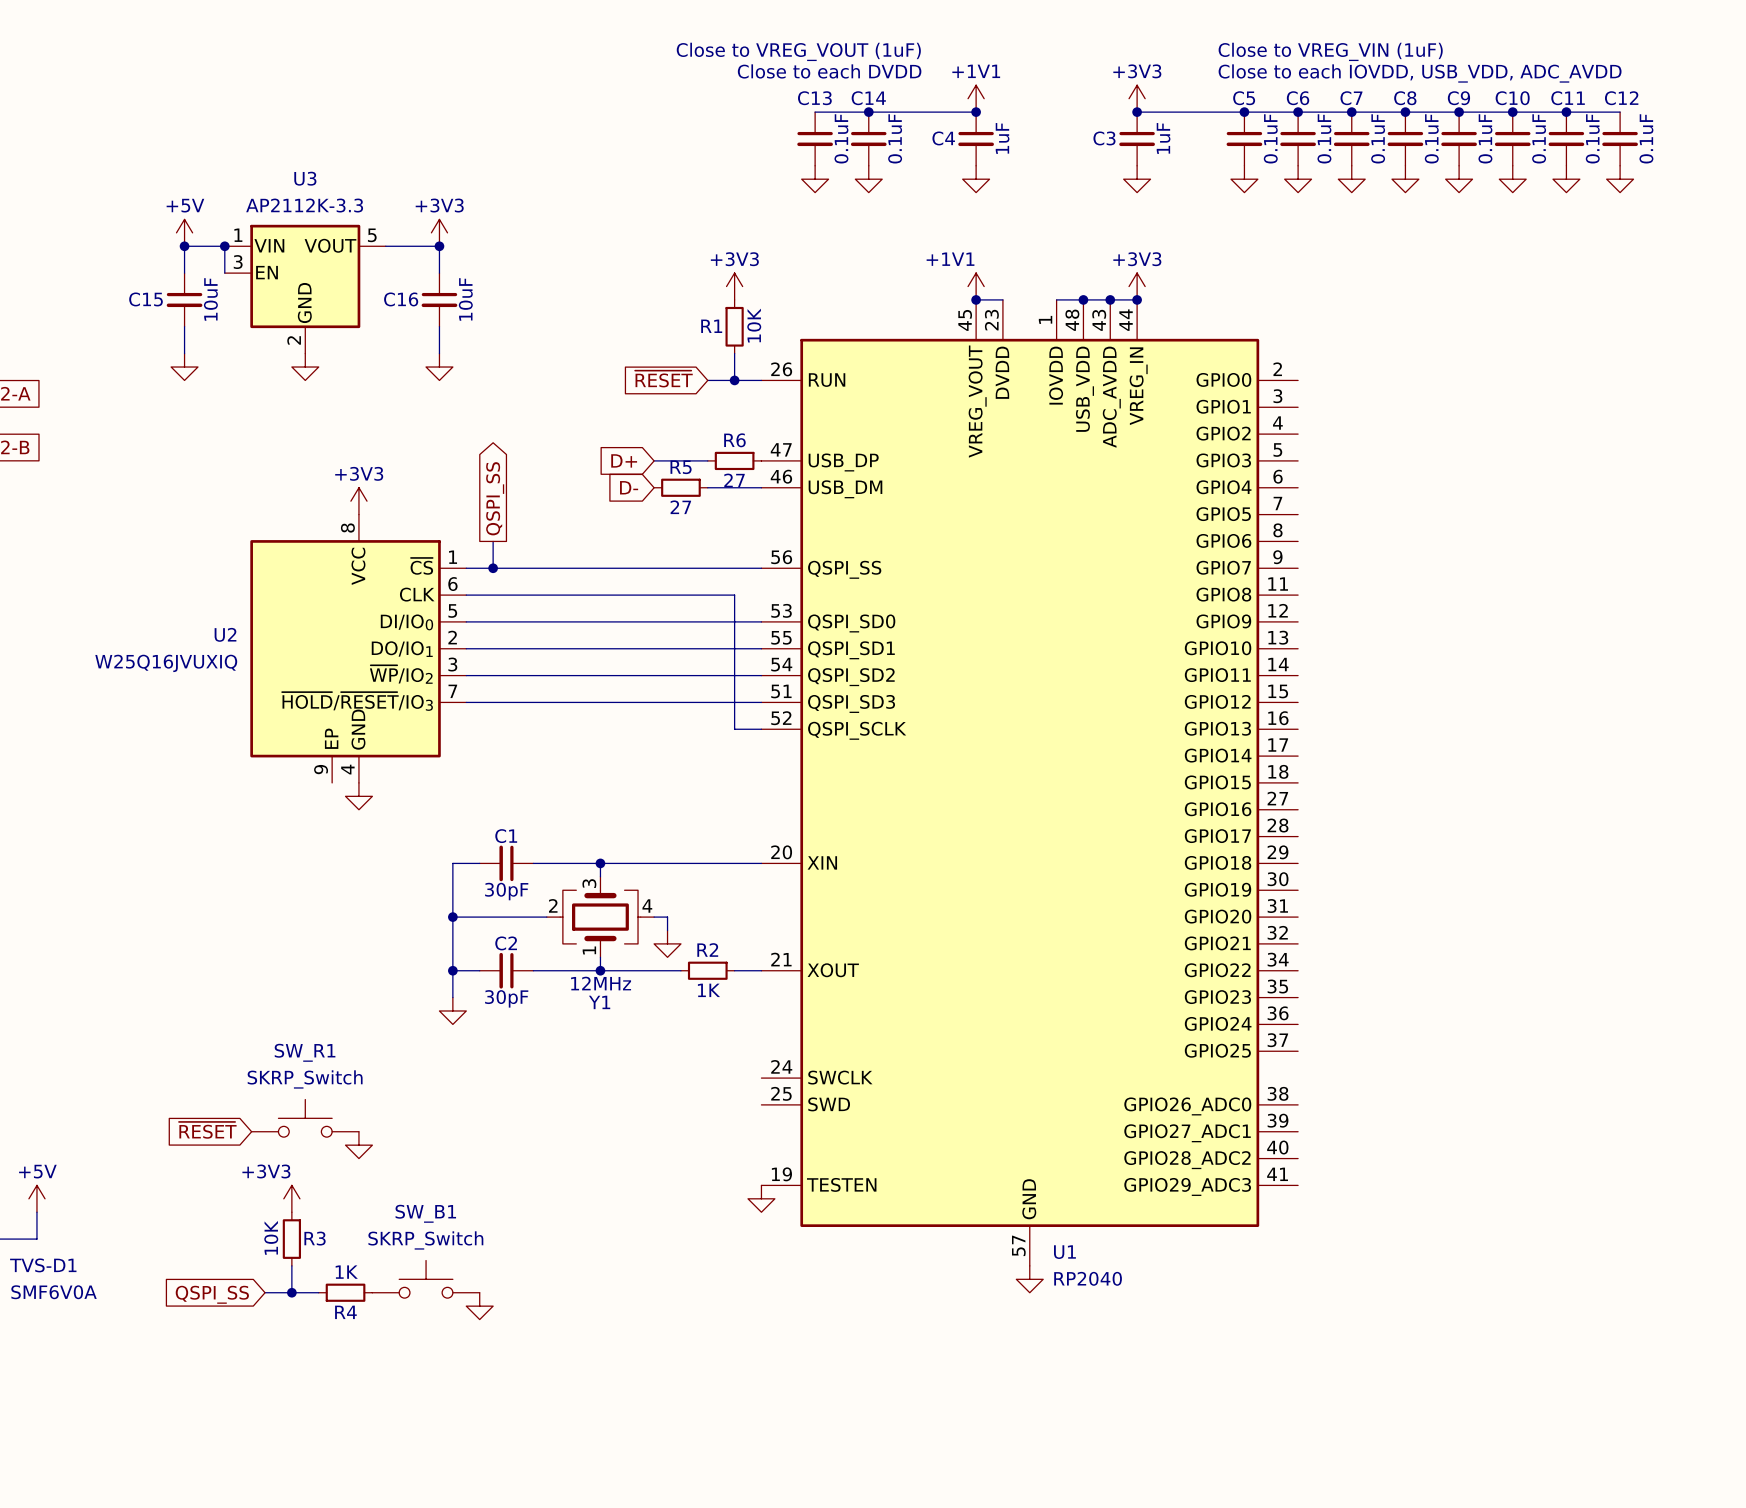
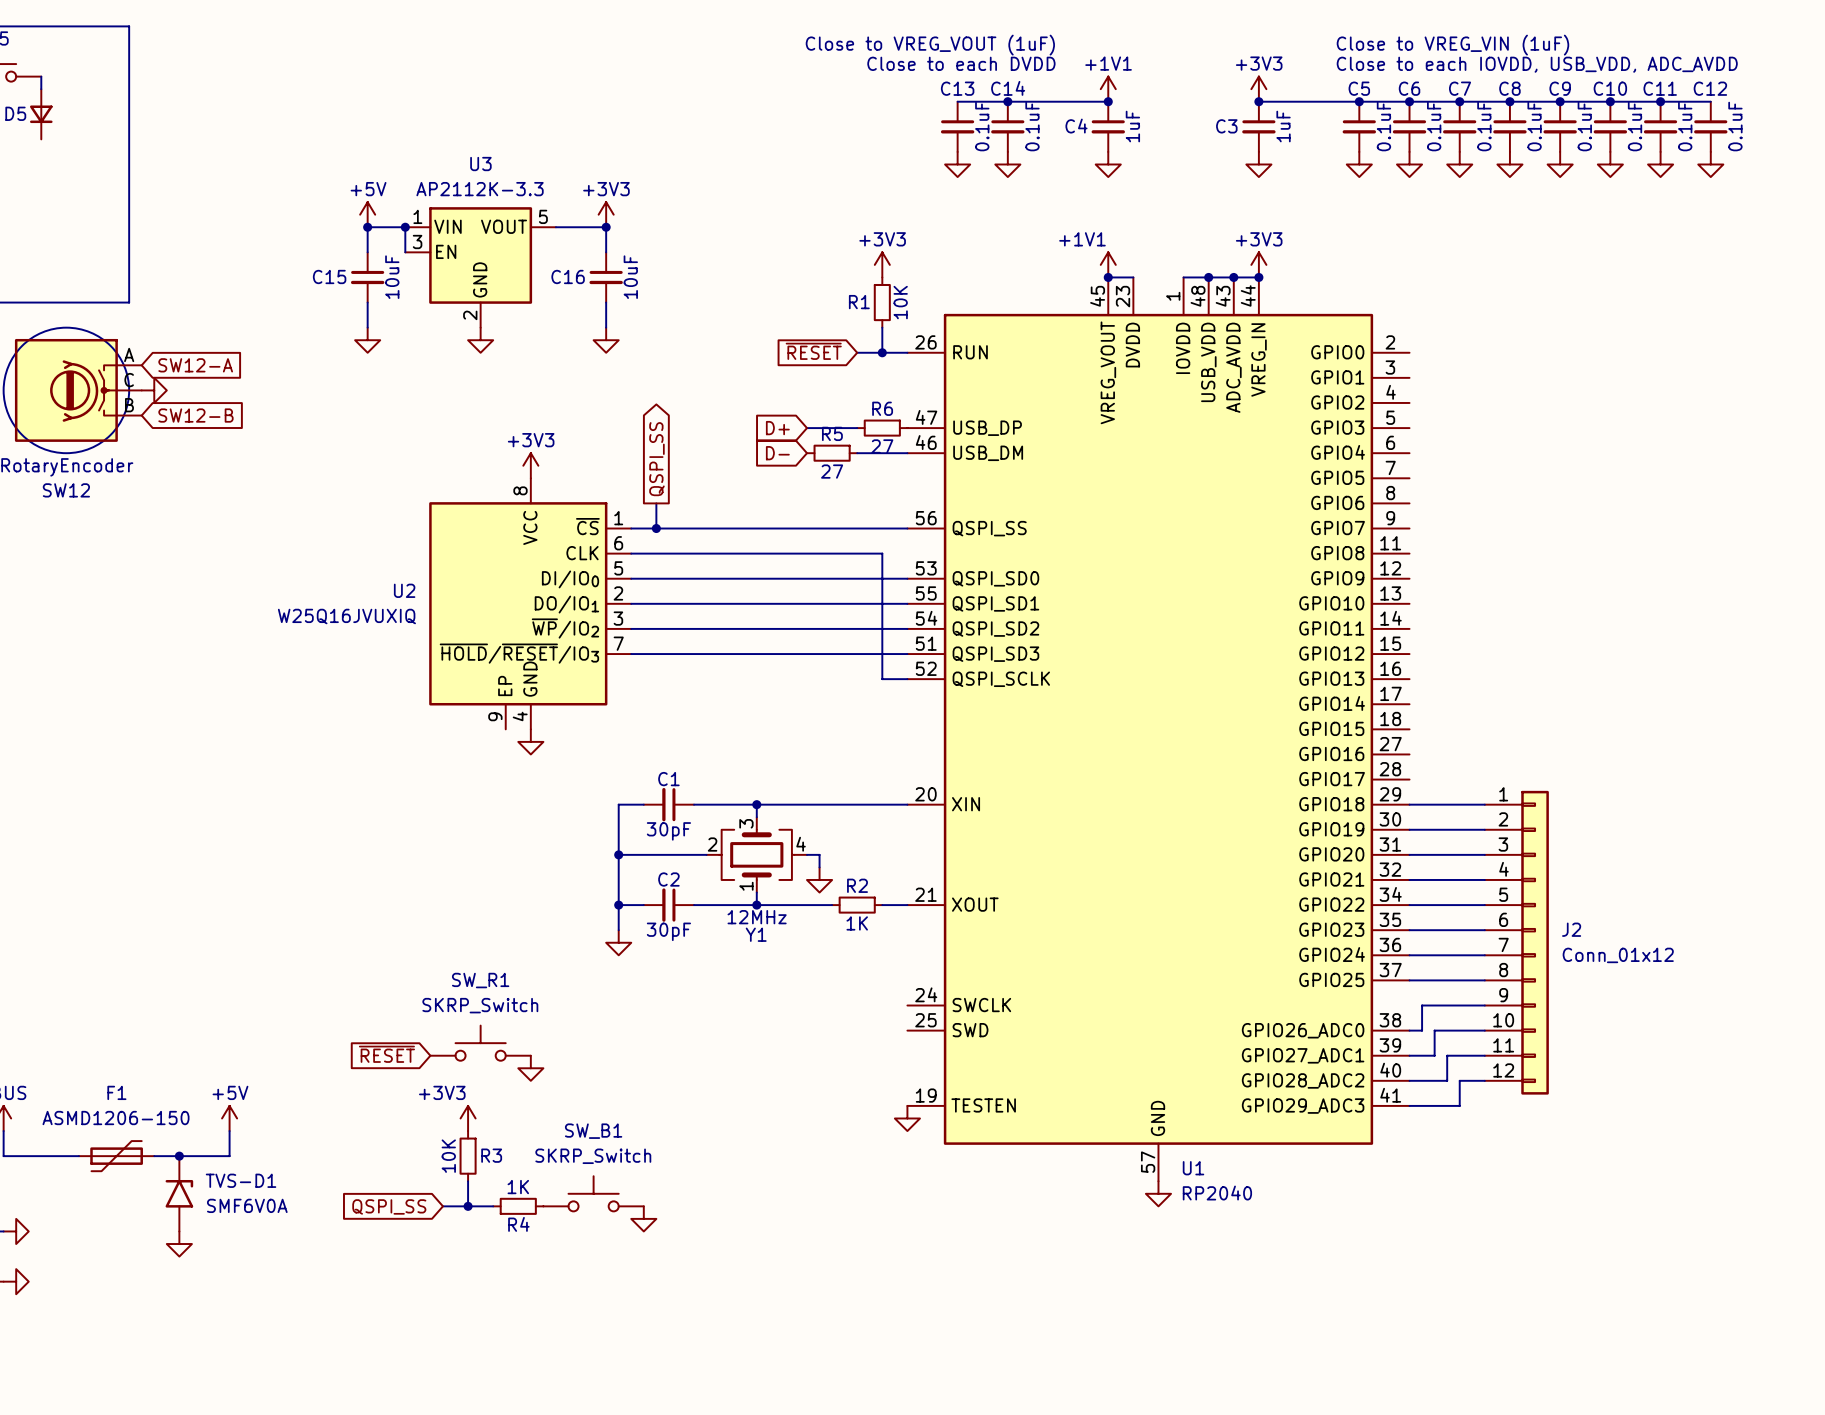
wire: none -> (1409, 804) (1484, 804)
wire: none -> (1409, 829) (1484, 829)
wire: none -> (1409, 854) (1484, 854)
wire: none -> (1409, 879) (1484, 879)
wire: none -> (1409, 905) (1484, 905)
wire: none -> (1409, 930) (1484, 930)
J2: none -> Conn_01x12 (1516, 942)
wire: none -> (1409, 955) (1484, 955)
wire: none -> (1409, 980) (1484, 980)
wire: none -> (1484, 1005) (1422, 1005) (1422, 1030) (1409, 1030)
wire: none -> (1484, 1030) (1434, 1030) (1434, 1055) (1409, 1055)
wire: none -> (1484, 1055) (1447, 1055) (1447, 1080) (1409, 1080)
wire: none -> (1484, 1080) (1459, 1080) (1459, 1105) (1409, 1105)

